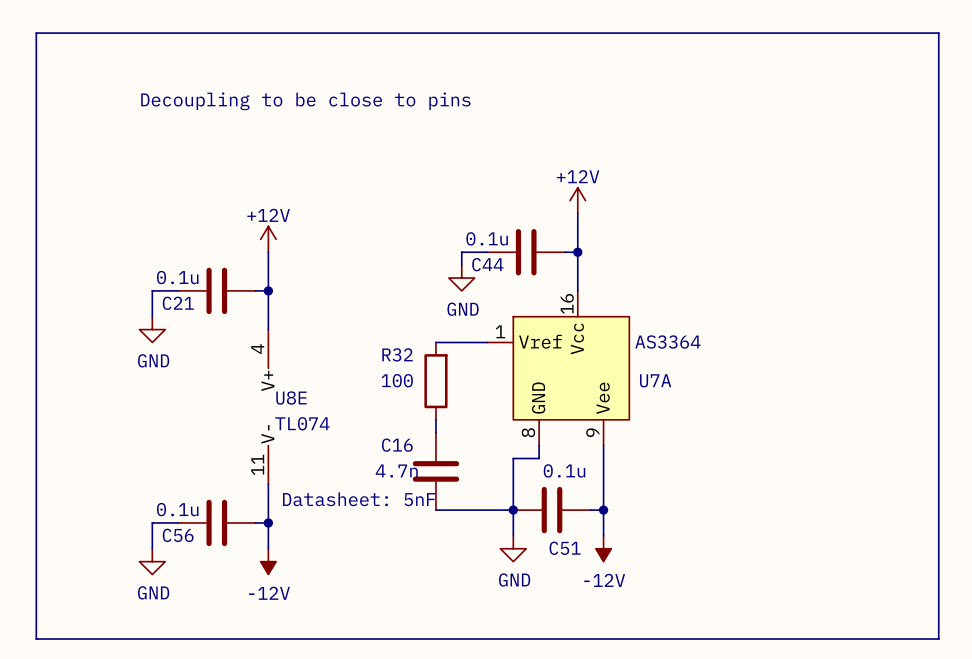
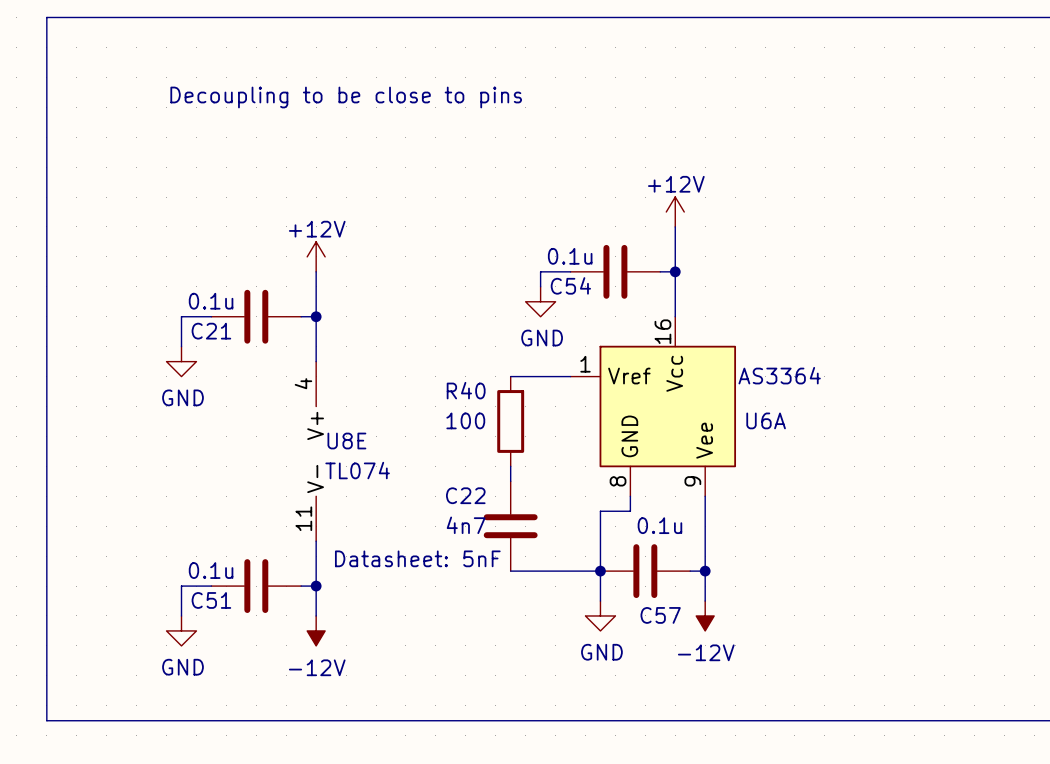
C44 name: C44 (487, 264) -> C54 (570, 285)
R32 name: R32 (397, 354) -> R40 (466, 390)
U7A name: U7A (655, 380) -> U6A (766, 420)
C16 name: C16 (397, 445) -> C22 (465, 495)
C16 value: 4.7n (396, 471) -> 4n7 (466, 525)
C56 name: C56 (178, 535) -> C51 (211, 600)
C51 name: C51 (565, 548) -> C57 (660, 615)

